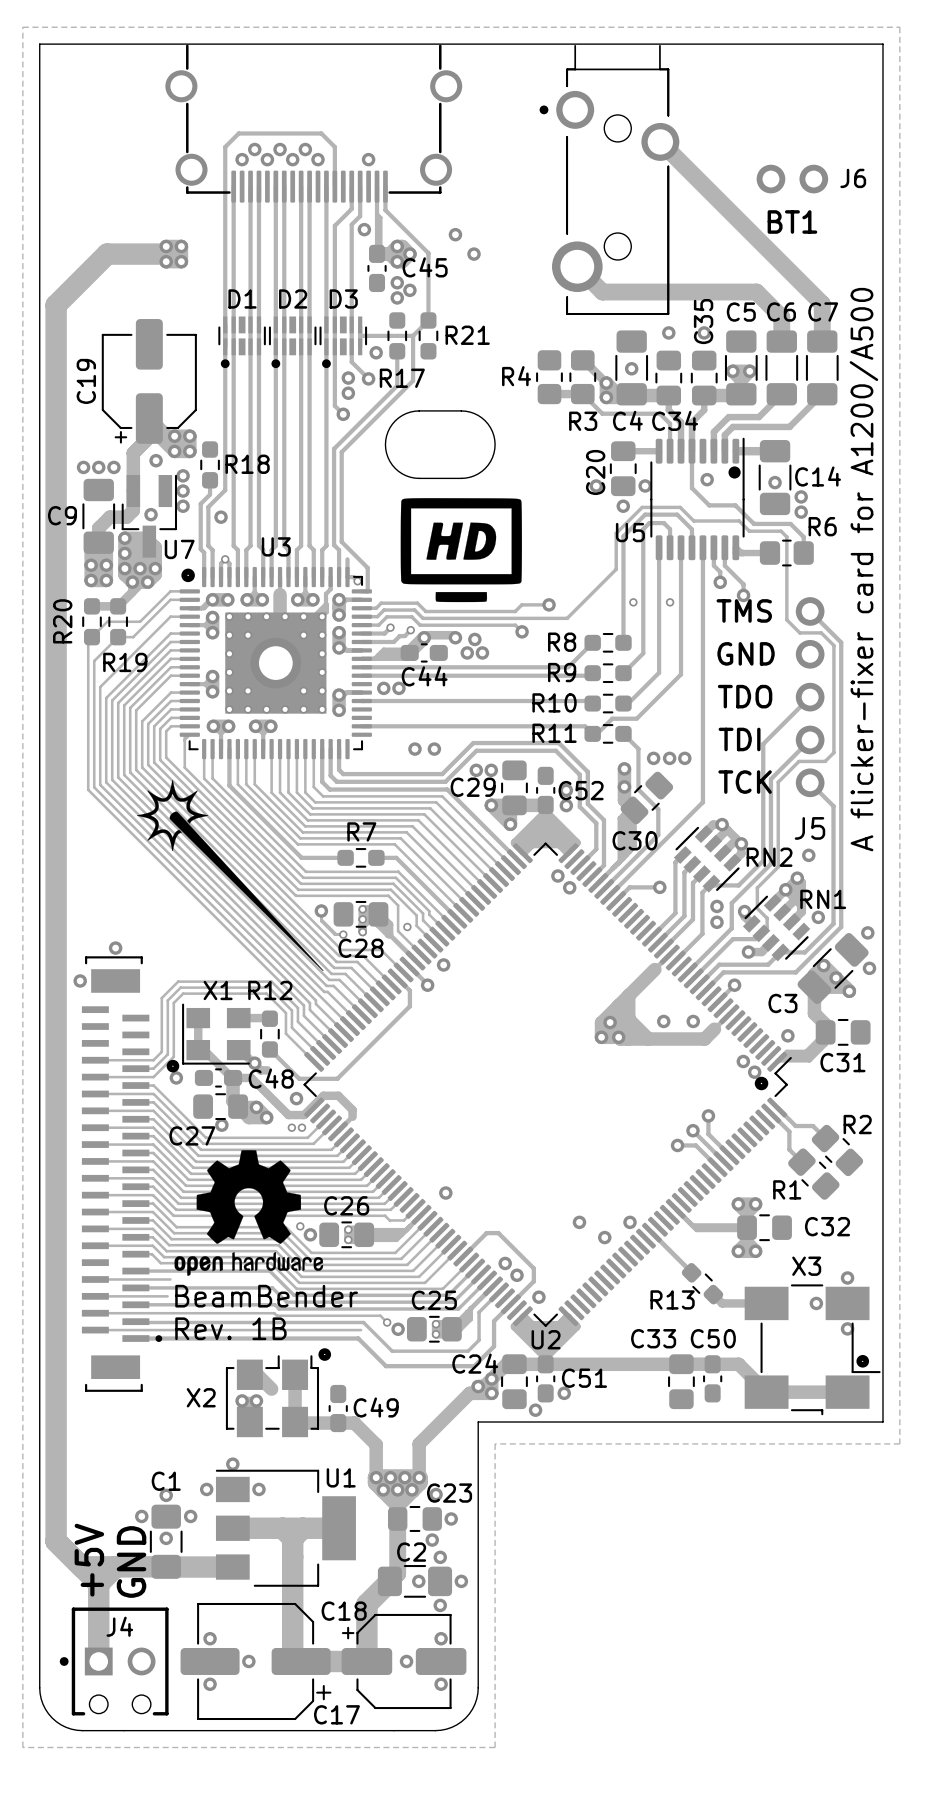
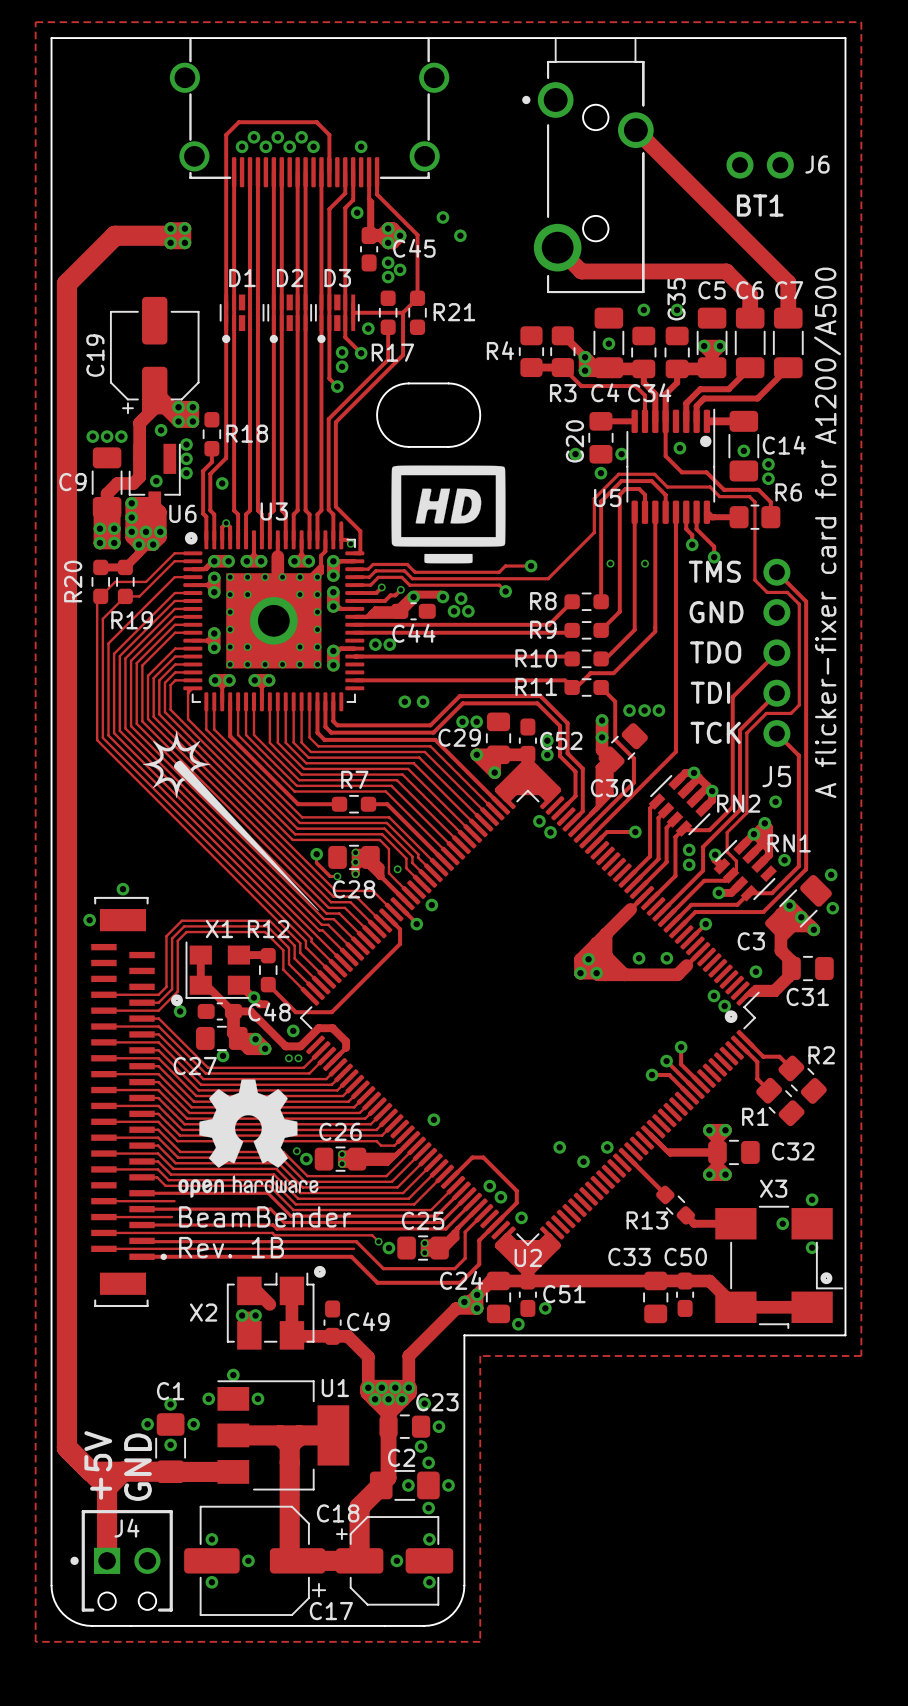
U7 name: U7 (179, 549) -> U6 (182, 513)

